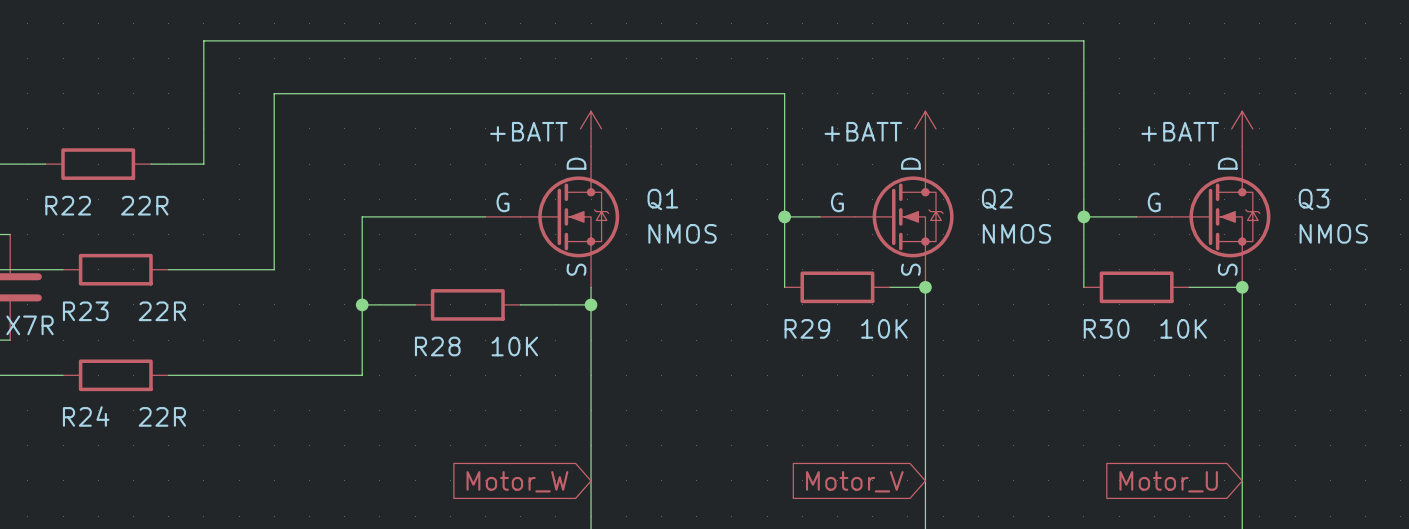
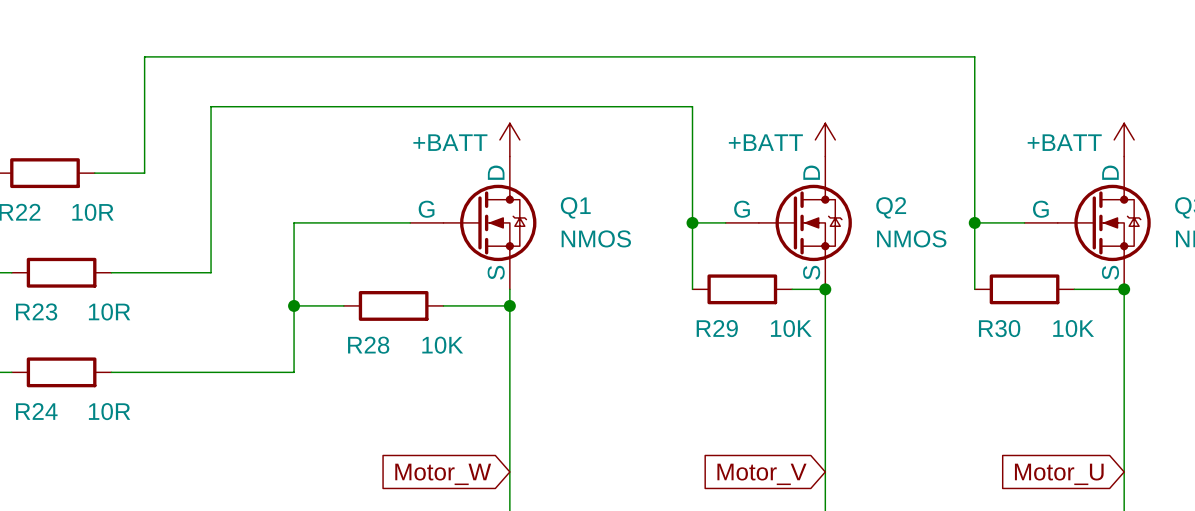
R22 value: 22R (144, 205) -> 10R (92, 212)
R23 value: 22R (162, 311) -> 10R (109, 311)
R24 value: 22R (162, 416) -> 10R (109, 411)

